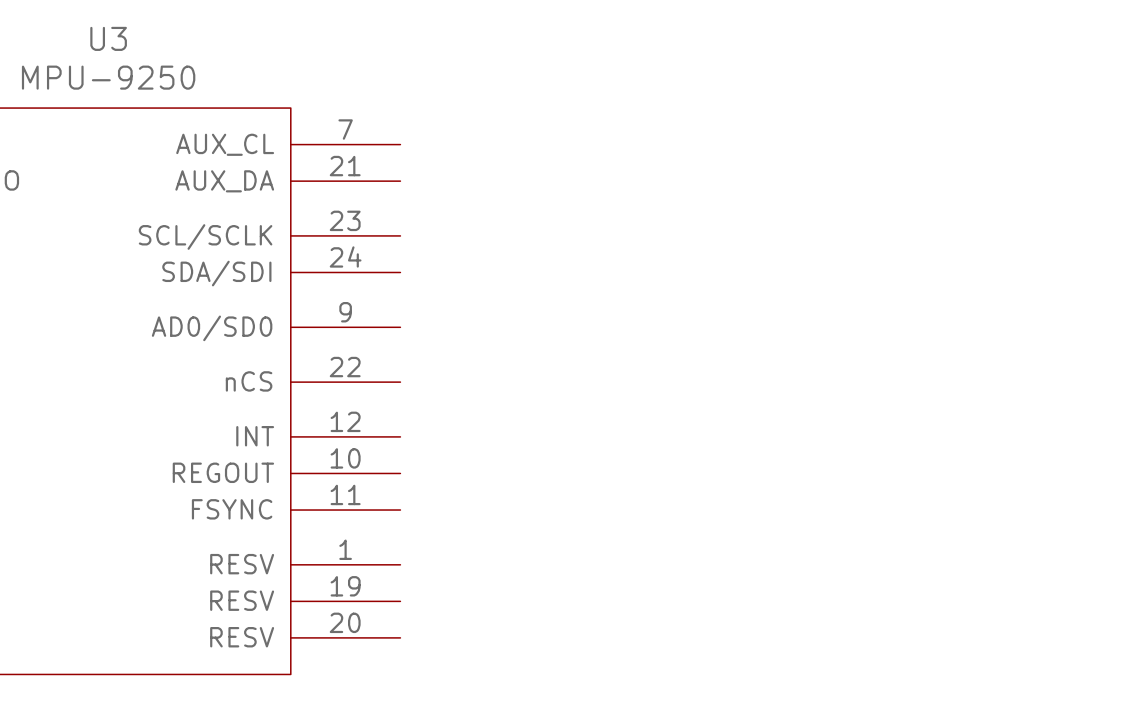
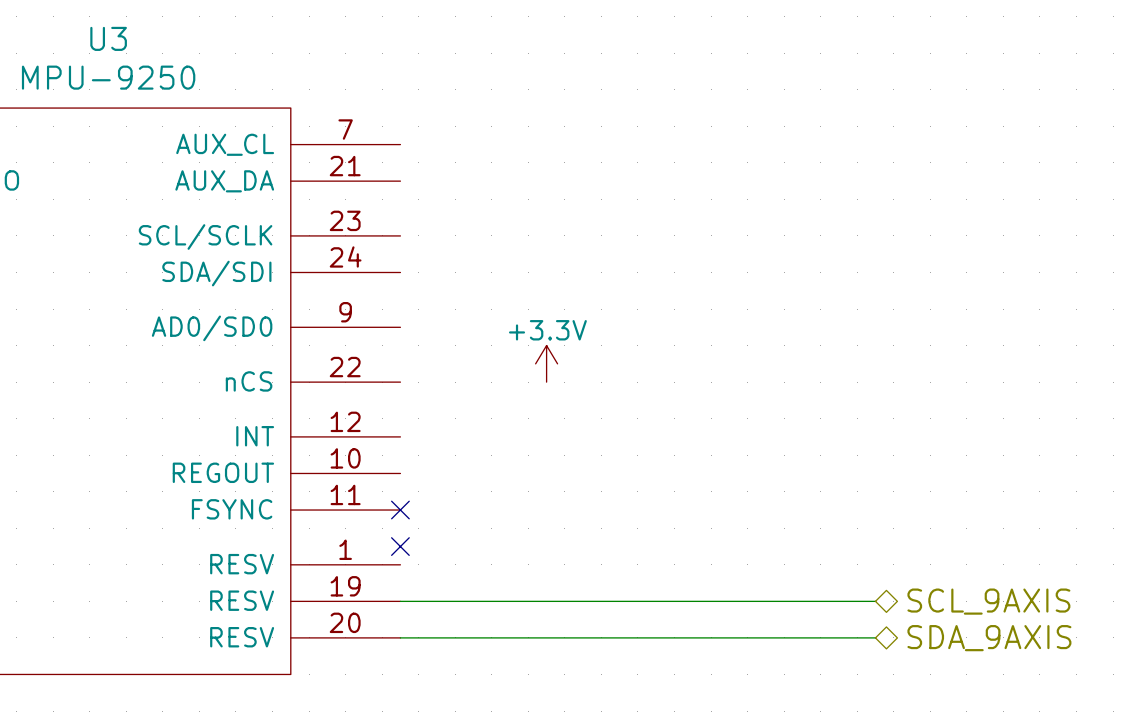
power symbol: none -> +3.3V (546, 363)
no-connect mark: none -> (400, 510)
no-connect mark: none -> (400, 546)
wire: none -> (400, 601) (875, 601)
hierarchical label: none -> SCL_9AXIS (988, 601)
wire: none -> (400, 637) (875, 637)
hierarchical label: none -> SDA_9AXIS (989, 638)

